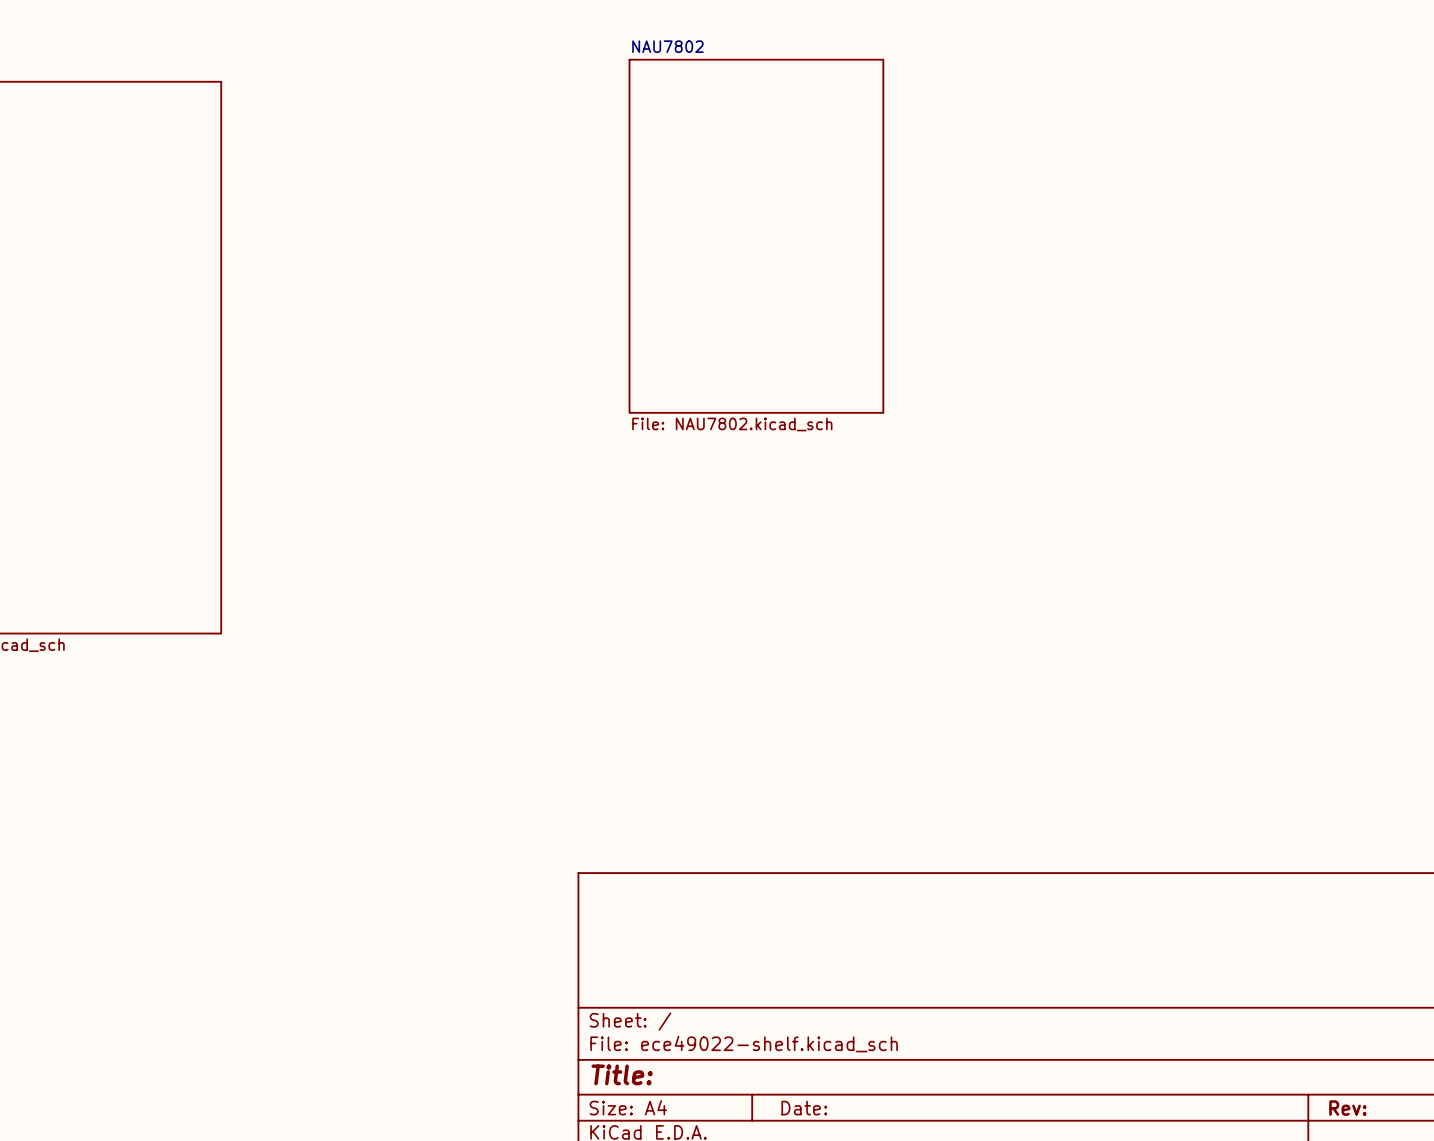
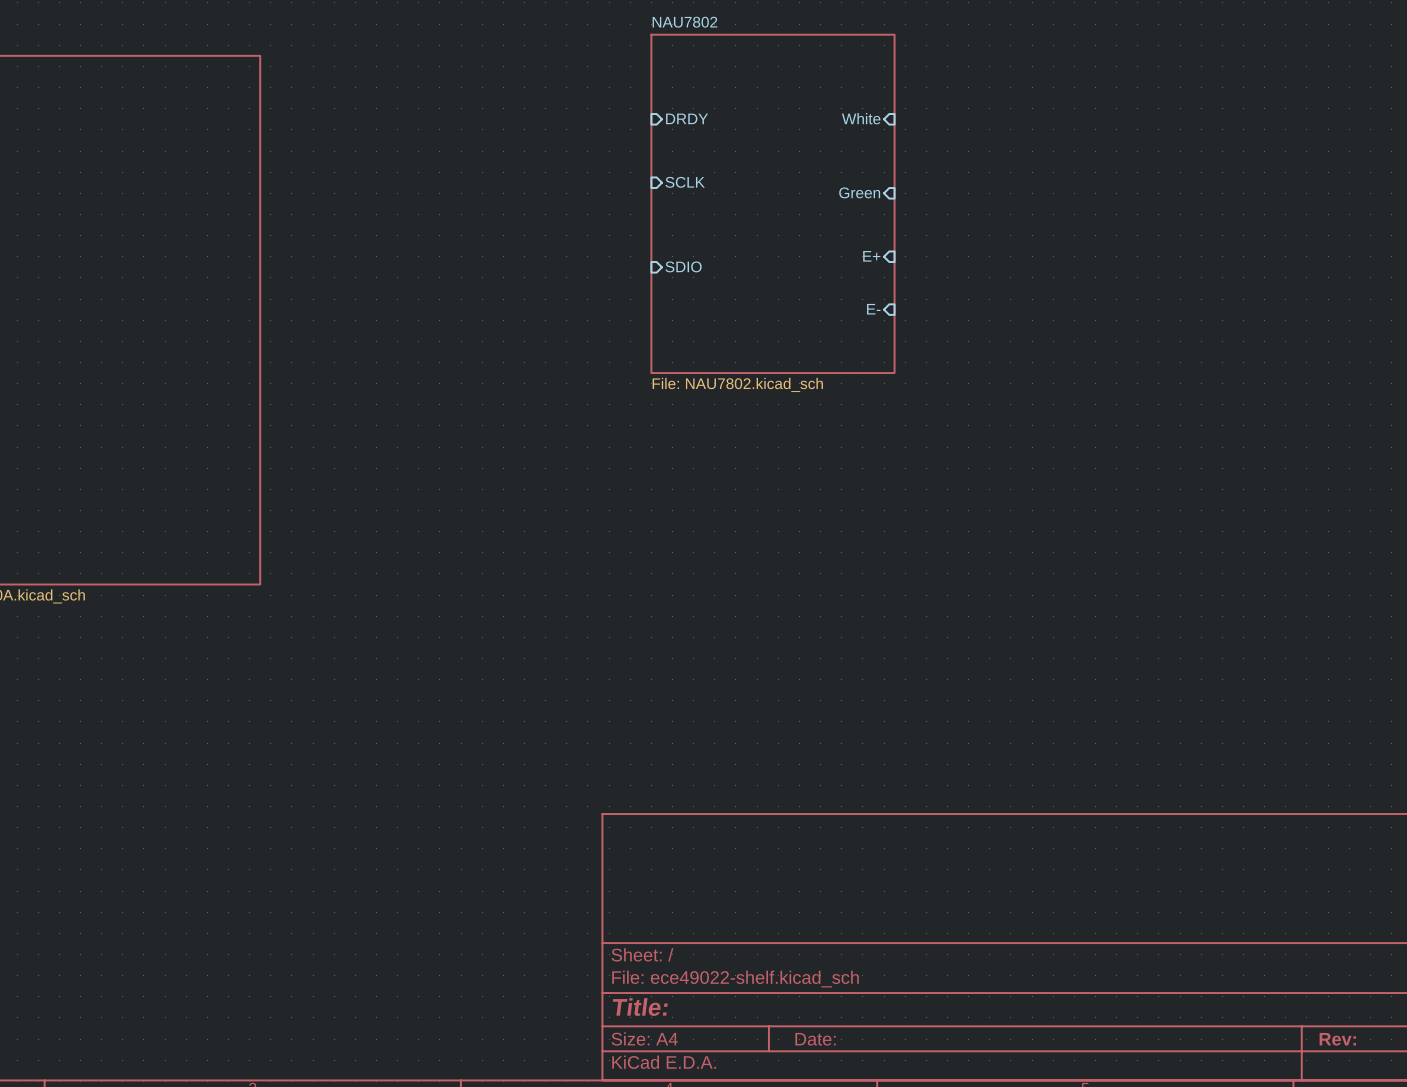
sheet pin: none -> DRDY (687, 118)
sheet pin: none -> White (861, 118)
sheet pin: none -> SCLK (685, 182)
sheet pin: none -> Green (859, 192)
sheet pin: none -> E+ (871, 256)
sheet pin: none -> SDIO (683, 266)
sheet pin: none -> E- (873, 309)

